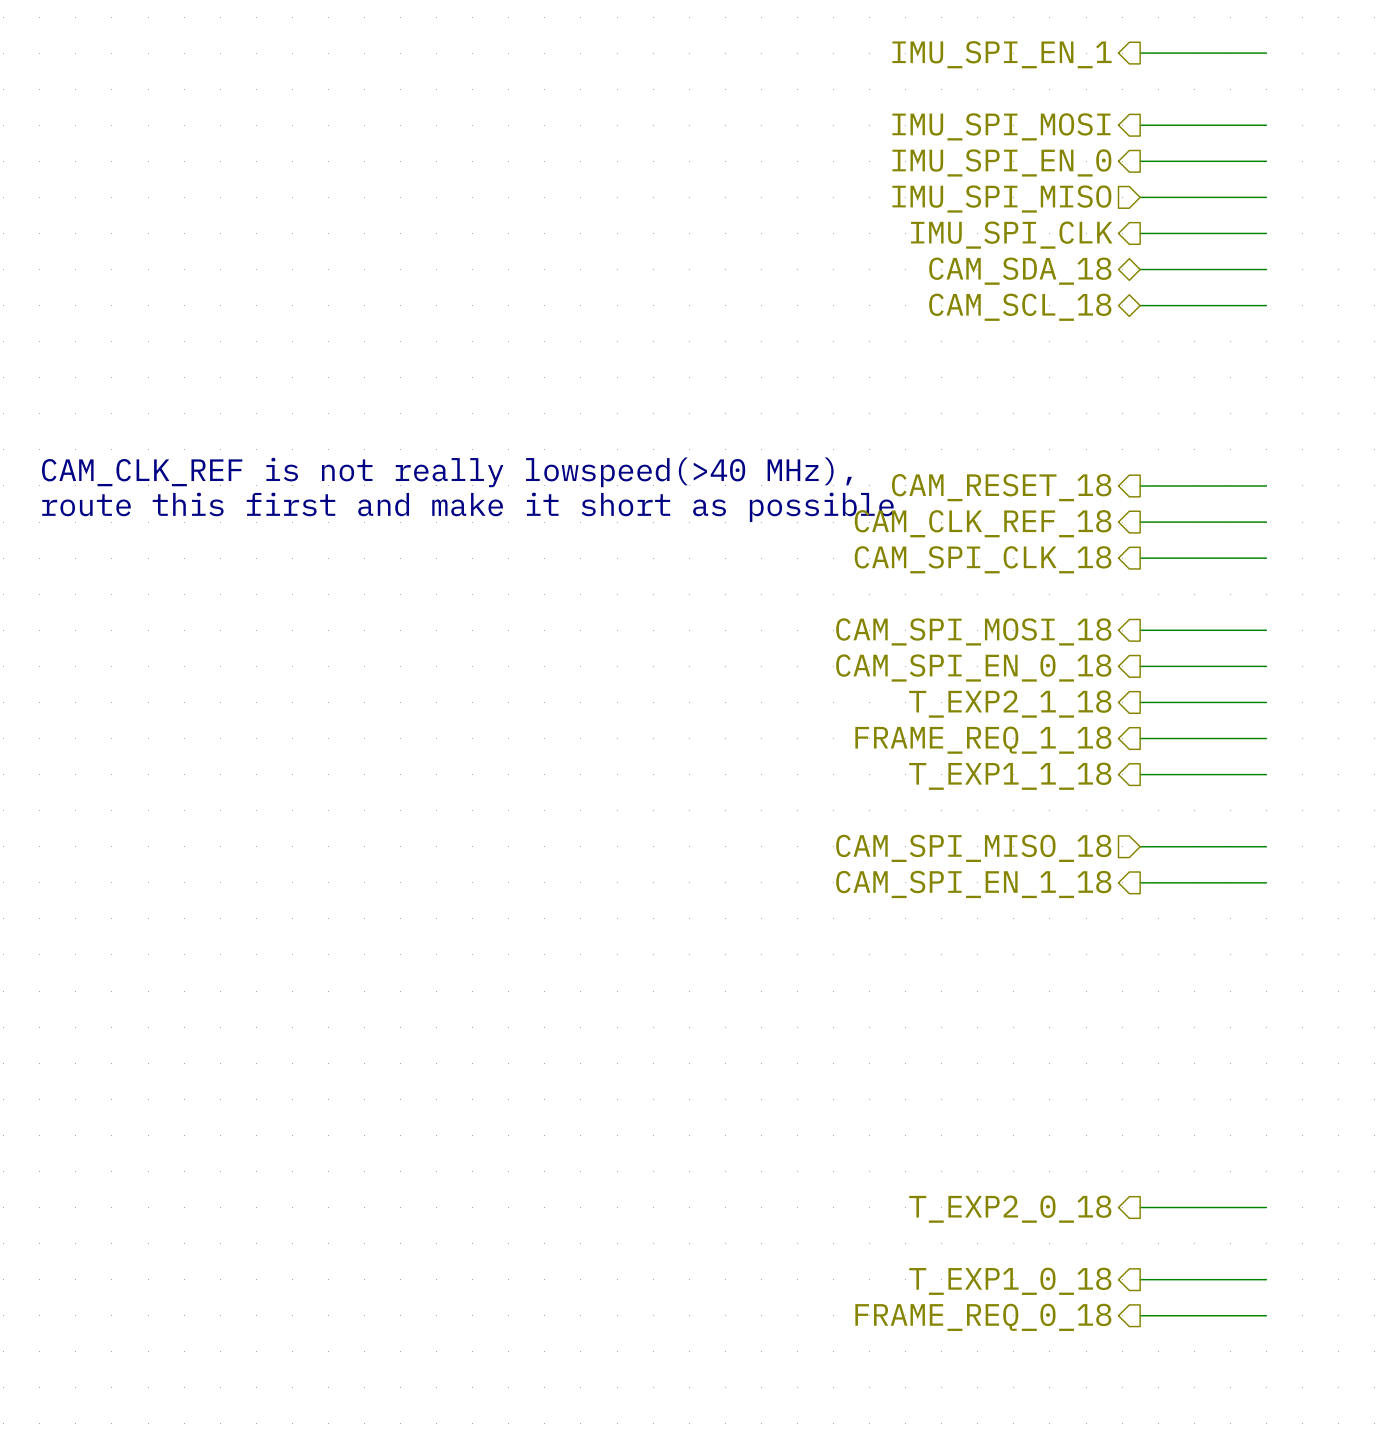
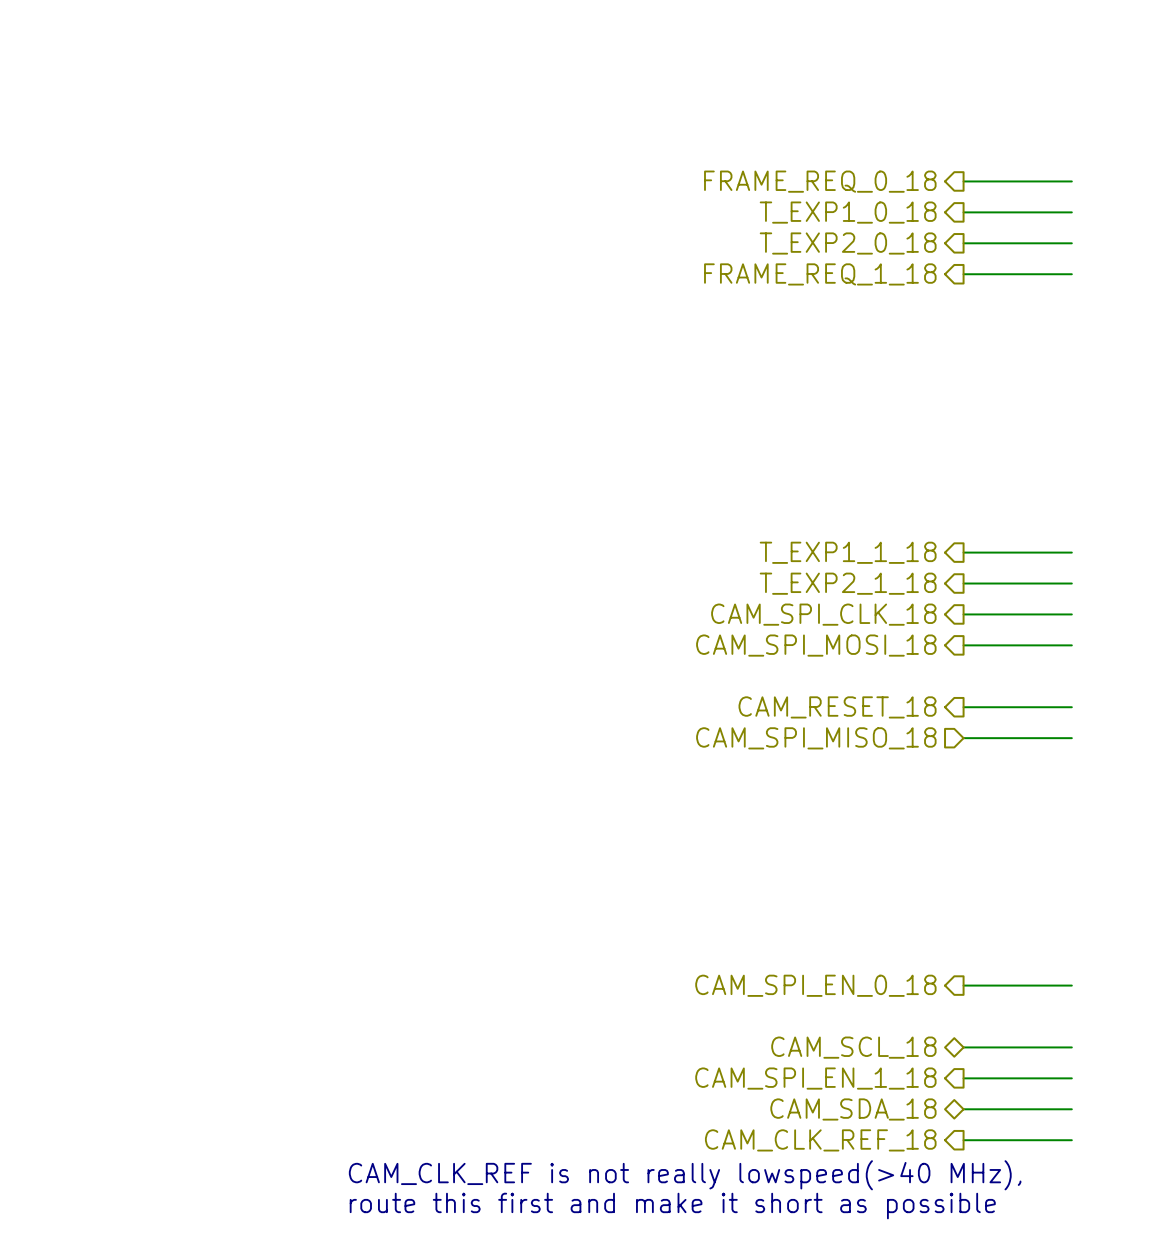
wire: (1140, 53) (1266, 53) -> none
hierarchical label: IMU_SPI_EN_1 (1002, 54) -> none
wire: (1140, 125) (1266, 125) -> none
hierarchical label: IMU_SPI_MOSI (1001, 126) -> none
wire: (1140, 161) (1266, 161) -> none
hierarchical label: IMU_SPI_EN_0 (1001, 162) -> none
hierarchical label shape: input (1001, 199) -> output (820, 181)
hierarchical label: IMU_SPI_MISO (1001, 199) -> FRAME_REQ_0_18 (820, 181)
hierarchical label: IMU_SPI_CLK (1011, 235) -> T_EXP1_0_18 (848, 212)
hierarchical label shape: bidirectional (1020, 271) -> output (848, 243)
hierarchical label: CAM_SDA_18 (1020, 271) -> T_EXP2_0_18 (848, 243)
hierarchical label shape: bidirectional (1020, 307) -> output (820, 274)
hierarchical label: CAM_SCL_18 (1020, 307) -> FRAME_REQ_1_18 (820, 274)
text: CAM_CLK_REF is not really lowspeed(>40 MHz), (446, 472) -> none
wire: (1140, 485) (1266, 485) -> none
hierarchical label position: CAM_RESET_18 (1001, 487) -> CAM_RESET_18 (837, 707)
text: route this first and make it short as possible (467, 507) -> none
wire: (1140, 522) (1266, 522) -> none
hierarchical label: CAM_CLK_REF_18 (983, 523) -> none
wire: (1140, 558) (1266, 558) -> (963, 707) (1071, 707)
hierarchical label: CAM_SPI_CLK_18 (983, 559) -> none
hierarchical label: CAM_SPI_MOSI_18 (973, 631) -> T_EXP1_1_18 (848, 552)
hierarchical label: CAM_SPI_EN_0_18 (973, 668) -> T_EXP2_1_18 (848, 583)
hierarchical label: T_EXP2_1_18 (1010, 704) -> CAM_SPI_CLK_18 (823, 614)
hierarchical label: FRAME_REQ_1_18 (983, 740) -> CAM_SPI_MOSI_18 (816, 645)
wire: (1140, 774) (1266, 774) -> none
hierarchical label: T_EXP1_1_18 (1010, 776) -> none
wire: (1140, 882) (1266, 882) -> (963, 985) (1071, 985)
hierarchical label: CAM_SPI_EN_1_18 (973, 884) -> none
hierarchical label: none -> CAM_SPI_EN_0_18 (815, 985)
hierarchical label shape: output (1010, 1209) -> bidirectional (853, 1047)
hierarchical label: T_EXP2_0_18 (1010, 1209) -> CAM_SCL_18 (853, 1047)
wire: none -> (963, 1078) (1071, 1078)
hierarchical label: none -> CAM_SPI_EN_1_18 (815, 1078)
hierarchical label shape: output (1010, 1281) -> bidirectional (853, 1109)
hierarchical label: T_EXP1_0_18 (1010, 1281) -> CAM_SDA_18 (853, 1109)
hierarchical label: FRAME_REQ_0_18 (983, 1317) -> CAM_CLK_REF_18 (820, 1140)
text: none -> CAM_CLK_REF is not really lowspeed(>40 MHz), (685, 1175)
text: none -> route this first and make it short as possible (672, 1206)

